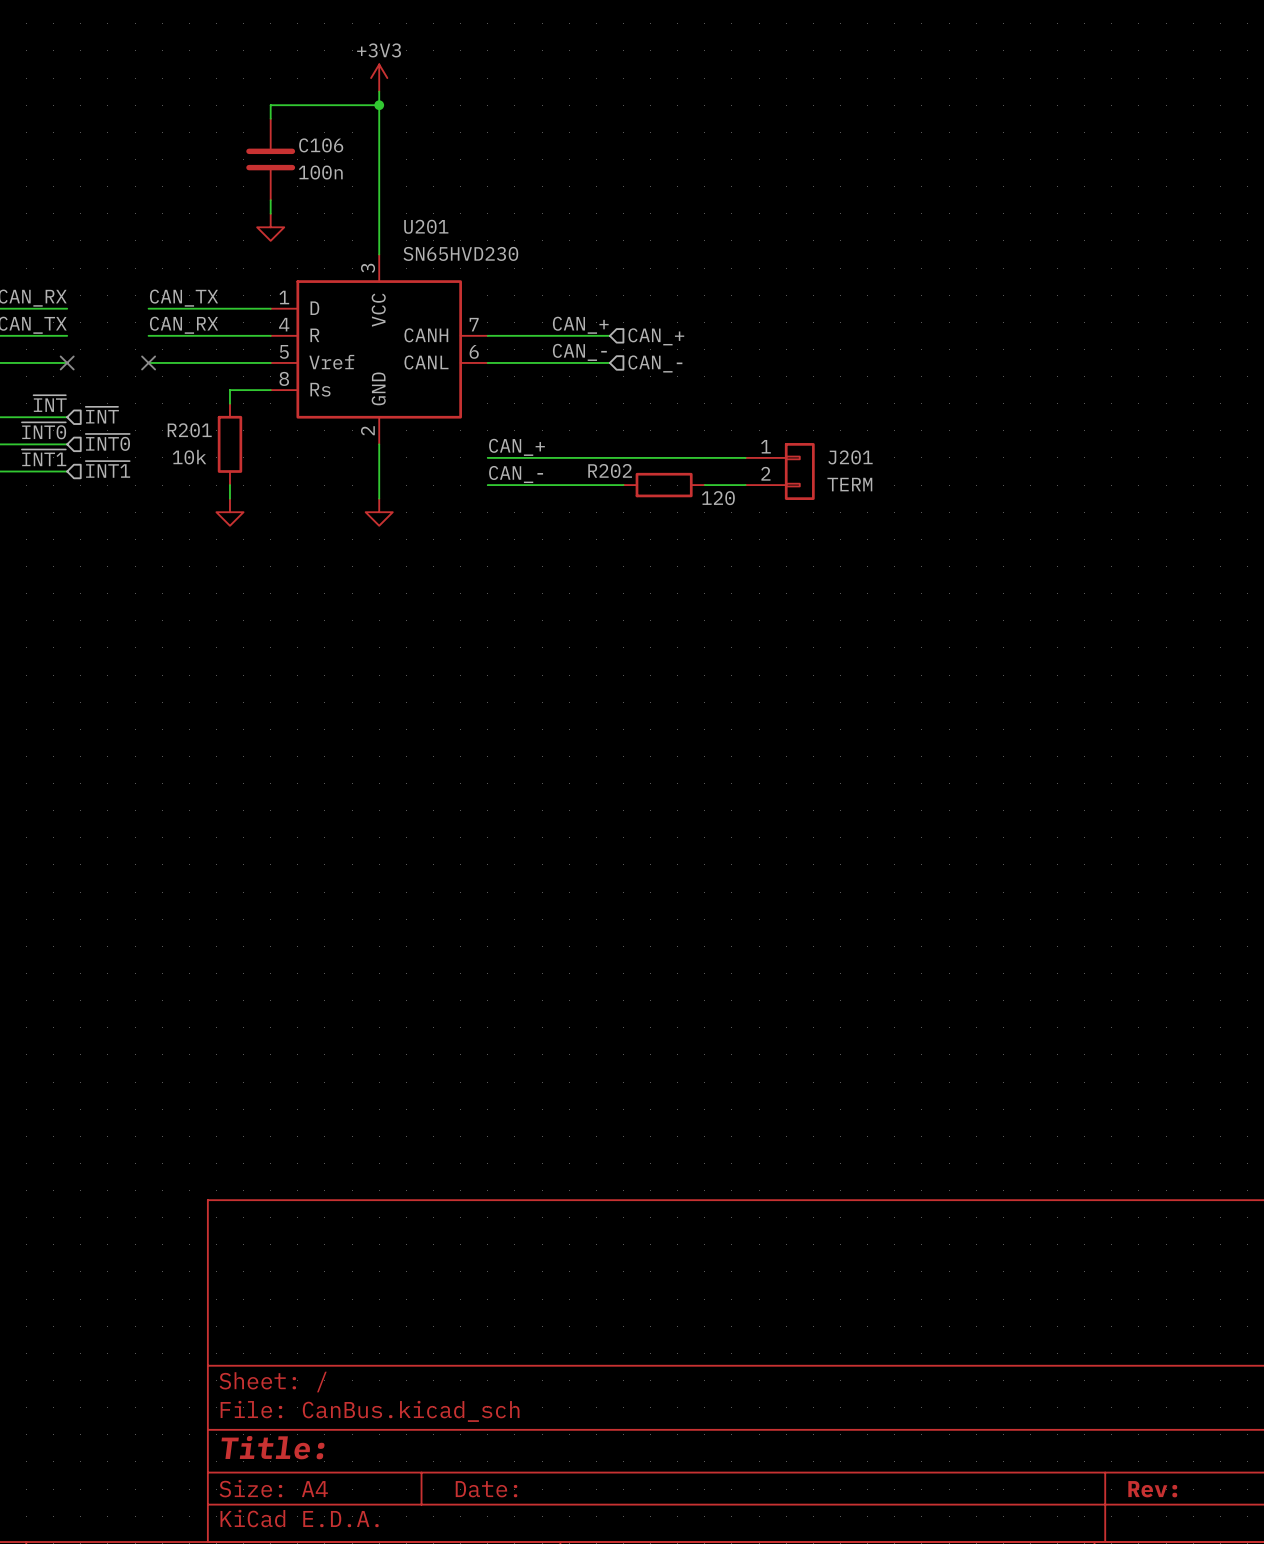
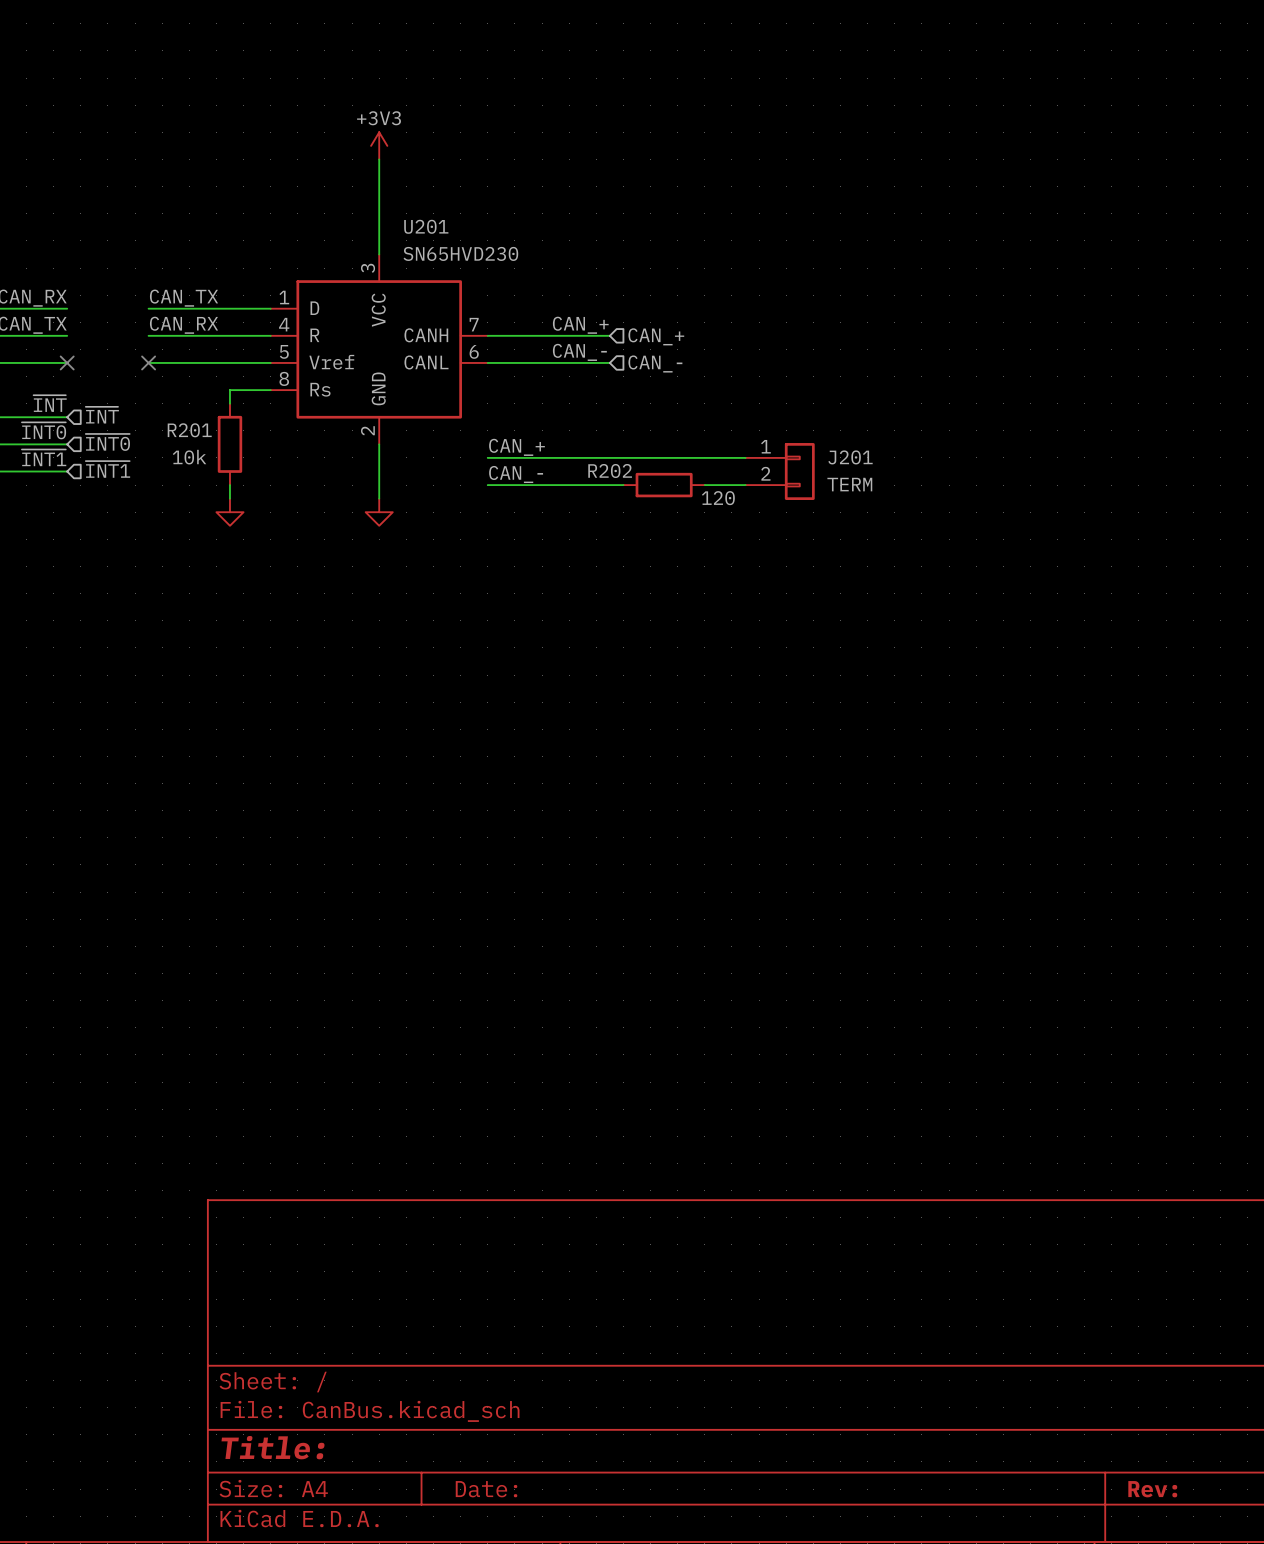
power symbol position: +3V3 (379, 78) -> +3V3 (379, 145)
wire: (379, 91) (379, 159) -> none
wire: (379, 105) (270, 105) (270, 118) -> none
junction: (379, 105) -> none
C106: 100n (270, 159) -> none
wire: (270, 200) (270, 213) -> none
power symbol: (270, 227) -> none

